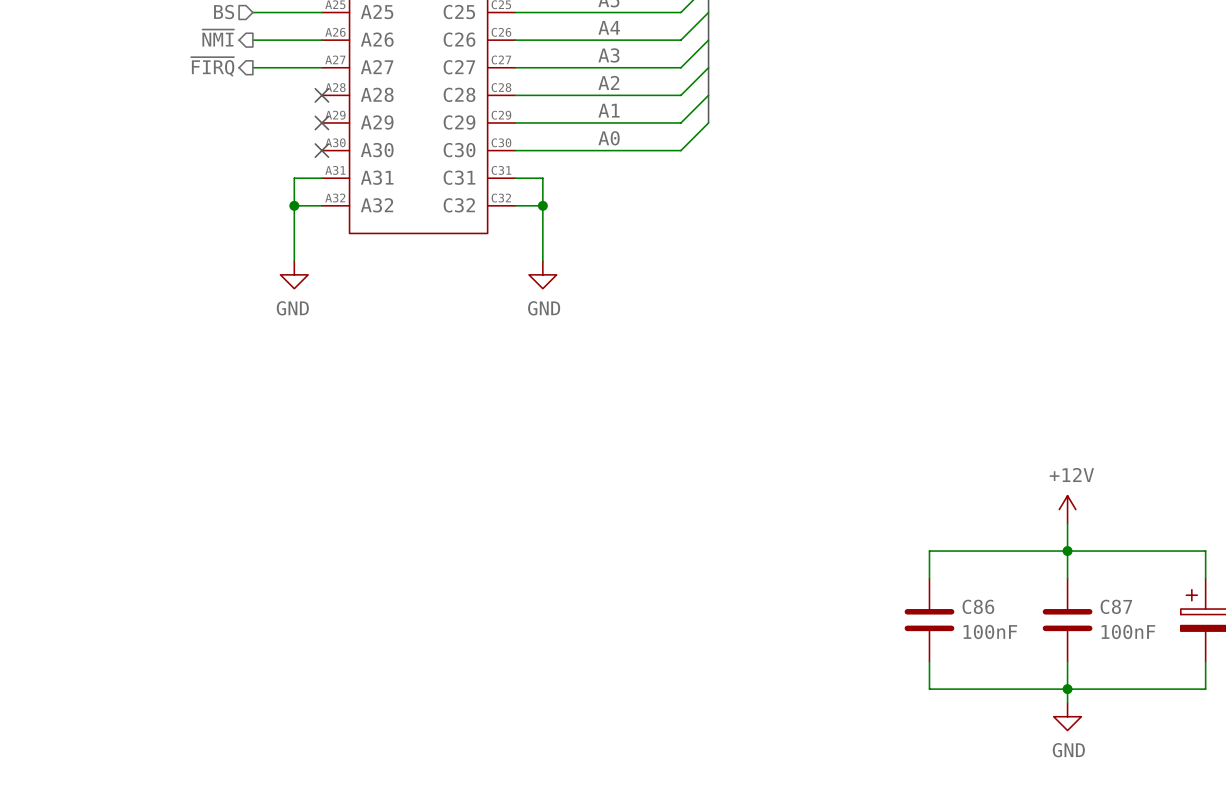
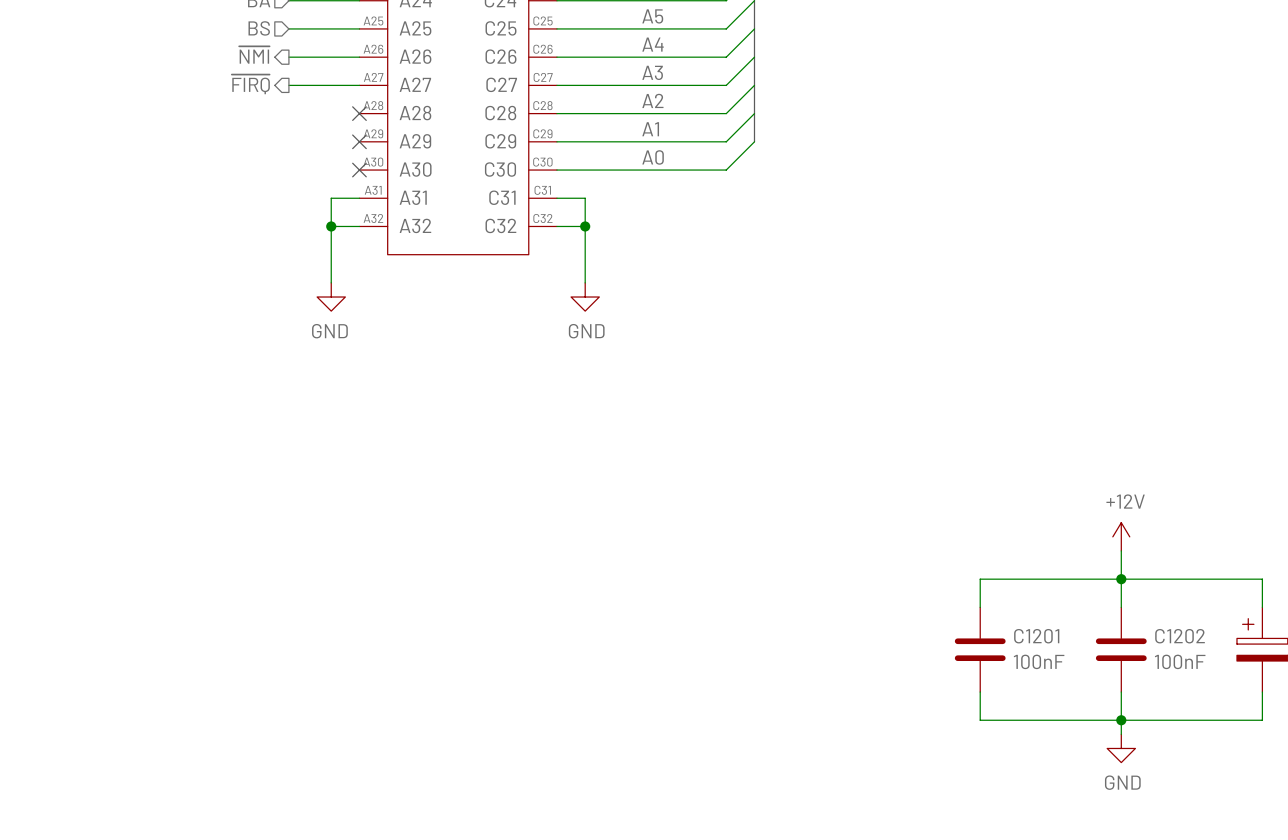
C86 name: C86 (978, 606) -> C1201 (1036, 636)
C87 name: C87 (1116, 606) -> C1202 (1180, 636)

